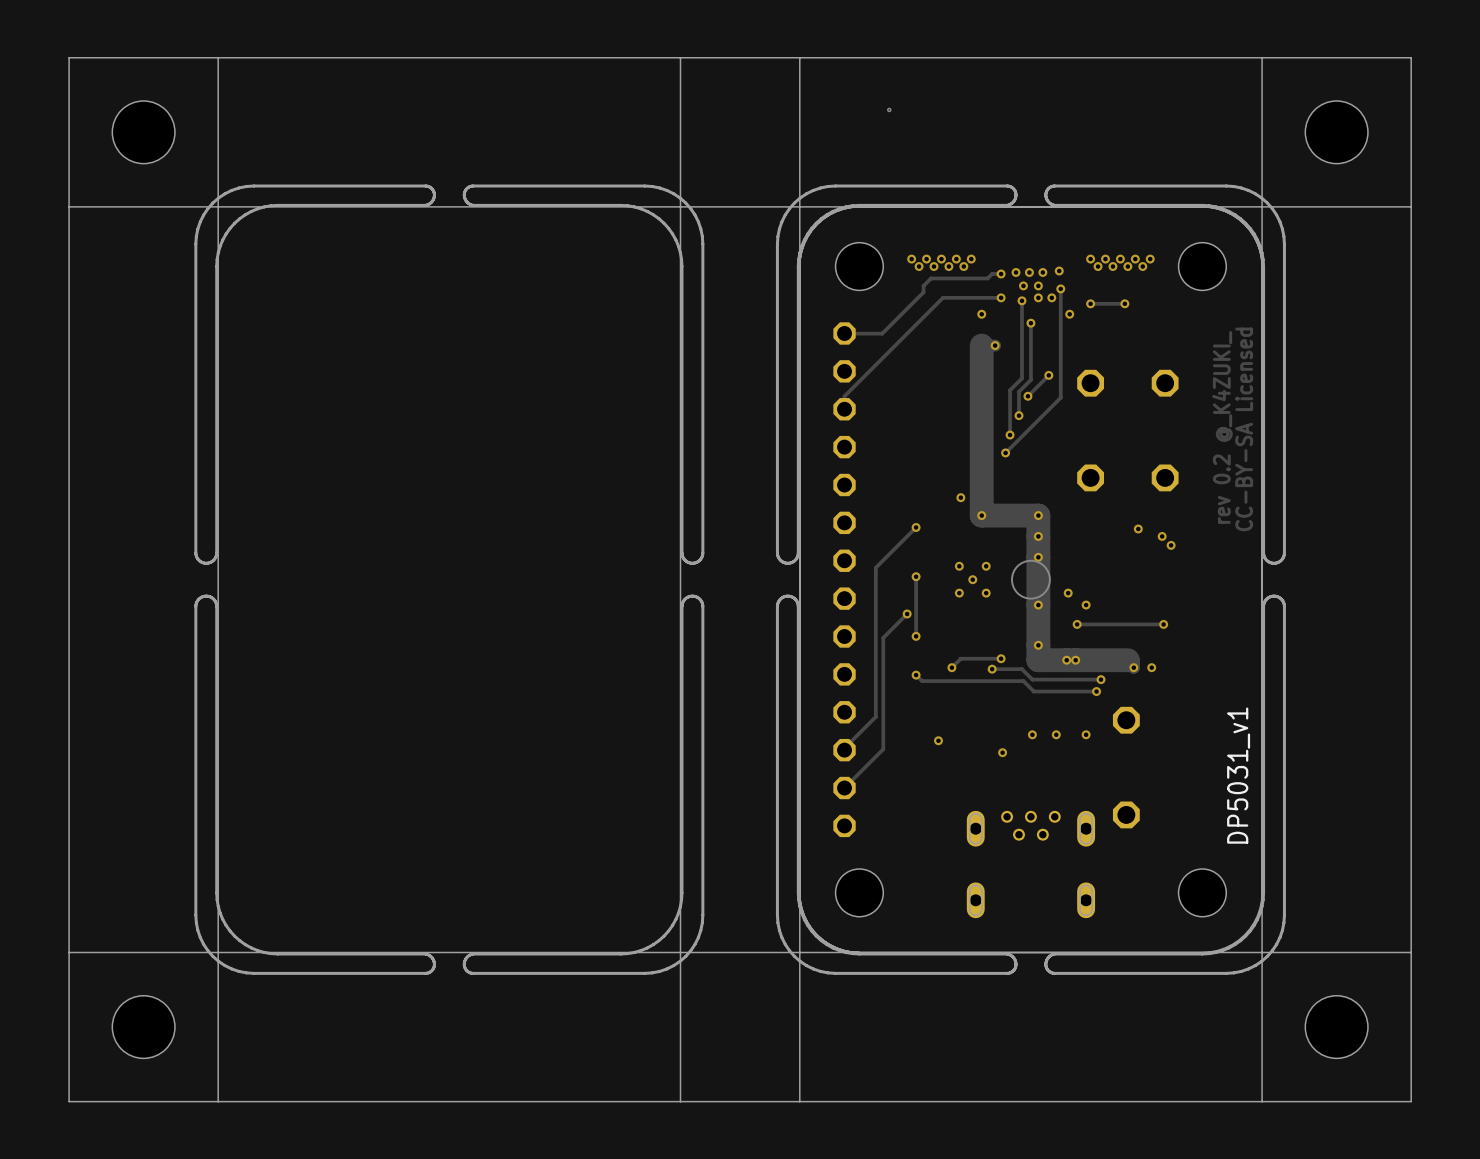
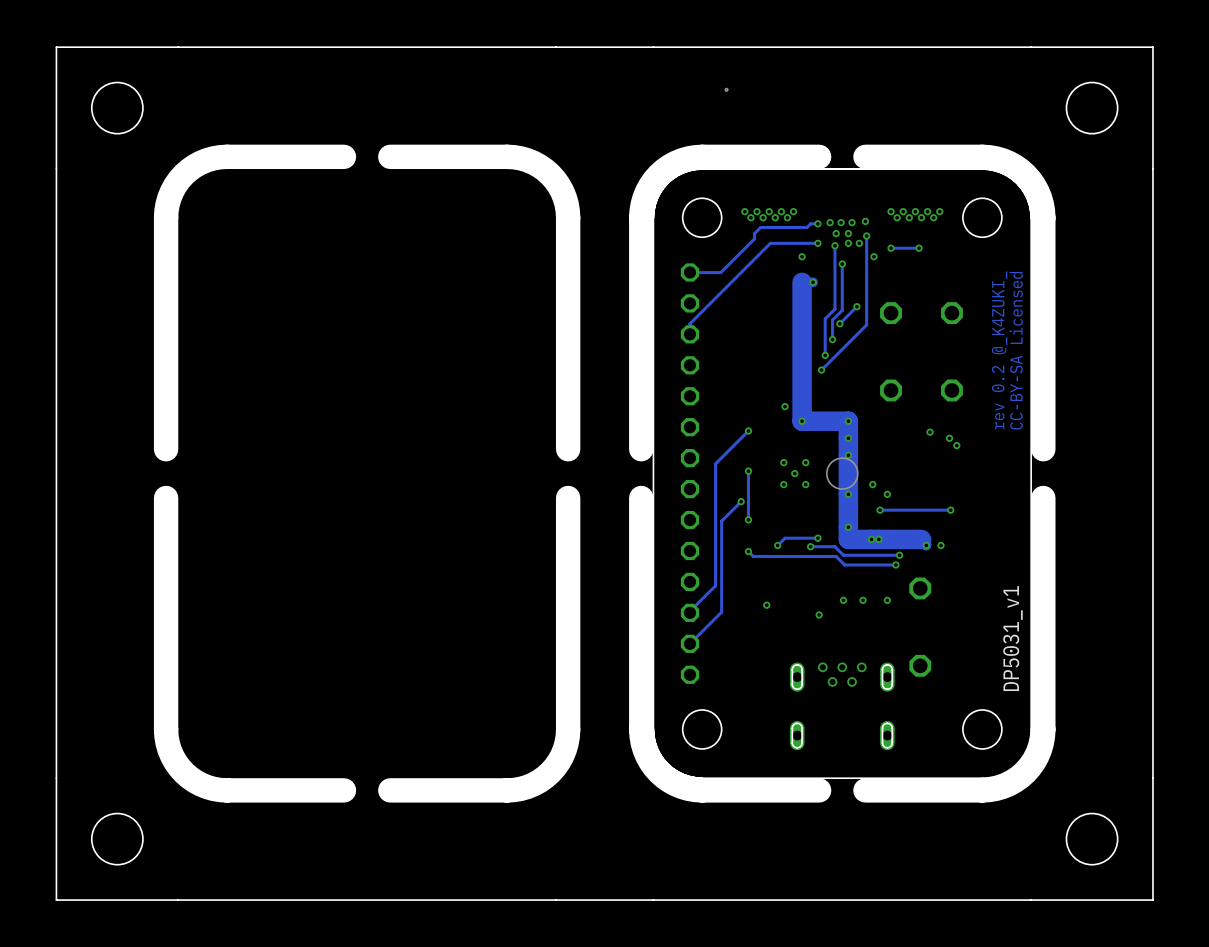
board edge: (218, 57) (218, 1101) -> none
board edge: (680, 57) (680, 1101) -> none
board edge: (799, 57) (799, 1101) -> none
board edge: (1262, 57) (1262, 1101) -> none
board edge: (425, 186) (246, 186) (231, 190) (218, 198) (203, 215) (197, 229) (195, 244) (195, 552) (201, 561) (210, 562) (216, 554) (216, 266) (218, 252) (226, 234) (234, 223) (245, 214) (257, 208) (271, 205) (426, 205) (431, 201) (434, 194) (431, 188) (425, 186) -> none
board edge: (644, 186) (659, 187) (680, 198) (695, 215) (702, 236) (702, 552) (699, 560) (693, 563) (685, 560) (681, 552) (681, 266) (680, 252) (672, 234) (664, 223) (653, 214) (634, 206) (473, 205) (466, 201) (464, 194) (466, 188) (473, 186) (644, 186) -> none
board edge: (1007, 186) (827, 186) (813, 190) (800, 198) (785, 215) (779, 229) (777, 244) (777, 552) (782, 561) (791, 562) (798, 554) (798, 266) (799, 252) (807, 234) (816, 223) (826, 214) (839, 208) (852, 205) (1008, 205) (1013, 201) (1016, 194) (1013, 188) (1007, 186) -> none
board edge: (1226, 186) (1054, 186) (1048, 188) (1045, 194) (1048, 201) (1054, 205) (1216, 206) (1234, 214) (1245, 223) (1254, 234) (1262, 252) (1263, 266) (1263, 552) (1266, 560) (1275, 563) (1281, 560) (1284, 552) (1283, 236) (1276, 215) (1261, 198) (1241, 187) (1226, 186) -> none
board edge: none -> (343, 156) (220, 157) (206, 160) (194, 166) (183, 174) (175, 185) (169, 197) (166, 217) (166, 449)
board edge: none -> (390, 156) (514, 157) (527, 160) (539, 166) (550, 174) (558, 185) (564, 197) (568, 217) (568, 449)
board edge: none -> (819, 156) (695, 157) (682, 160) (669, 166) (659, 174) (650, 185) (644, 197) (641, 217) (641, 449)
board edge: none -> (865, 156) (989, 157) (1002, 160) (1014, 166) (1025, 174) (1033, 185) (1039, 197) (1043, 217) (1043, 449)
board edge: (859, 206) (69, 206) -> none
board edge: (1411, 206) (1202, 206) -> none
board edge: (206, 596) (213, 599) (216, 606) (216, 892) (218, 906) (226, 925) (234, 936) (245, 944) (264, 952) (425, 953) (431, 956) (434, 961) (433, 967) (429, 972) (246, 972) (231, 968) (218, 961) (203, 944) (197, 930) (195, 915) (195, 606) (198, 599) (206, 596) -> none
board edge: (692, 596) (685, 599) (681, 606) (681, 892) (680, 906) (672, 925) (664, 936) (653, 944) (634, 952) (473, 953) (467, 956) (464, 961) (464, 967) (468, 972) (652, 972) (666, 968) (680, 961) (695, 944) (700, 930) (702, 915) (702, 606) (699, 599) (692, 596) -> none
board edge: (787, 596) (795, 599) (798, 606) (798, 892) (799, 906) (807, 925) (816, 936) (826, 944) (845, 952) (1007, 953) (1012, 956) (1015, 961) (1015, 967) (1011, 972) (827, 972) (813, 968) (800, 961) (785, 944) (779, 930) (777, 915) (777, 606) (780, 599) (787, 596) -> none
board edge: (1274, 596) (1266, 599) (1263, 606) (1263, 892) (1262, 906) (1254, 925) (1245, 936) (1234, 944) (1216, 952) (1054, 953) (1049, 956) (1046, 961) (1046, 967) (1050, 972) (1233, 972) (1248, 968) (1261, 961) (1276, 944) (1282, 930) (1284, 915) (1284, 606) (1281, 599) (1274, 596) -> none
board edge: none -> (166, 497) (166, 729) (169, 749) (175, 761) (183, 772) (194, 781) (206, 786) (220, 790) (343, 790)
board edge: none -> (568, 497) (568, 729) (564, 749) (558, 761) (550, 772) (539, 781) (527, 786) (514, 790) (390, 790)
board edge: none -> (641, 497) (641, 729) (644, 749) (650, 761) (659, 772) (669, 781) (682, 786) (695, 790) (819, 790)
board edge: none -> (1043, 497) (1043, 729) (1039, 749) (1033, 761) (1025, 772) (1014, 781) (1002, 786) (989, 790) (865, 790)
board edge: (1411, 952) (69, 952) -> none

